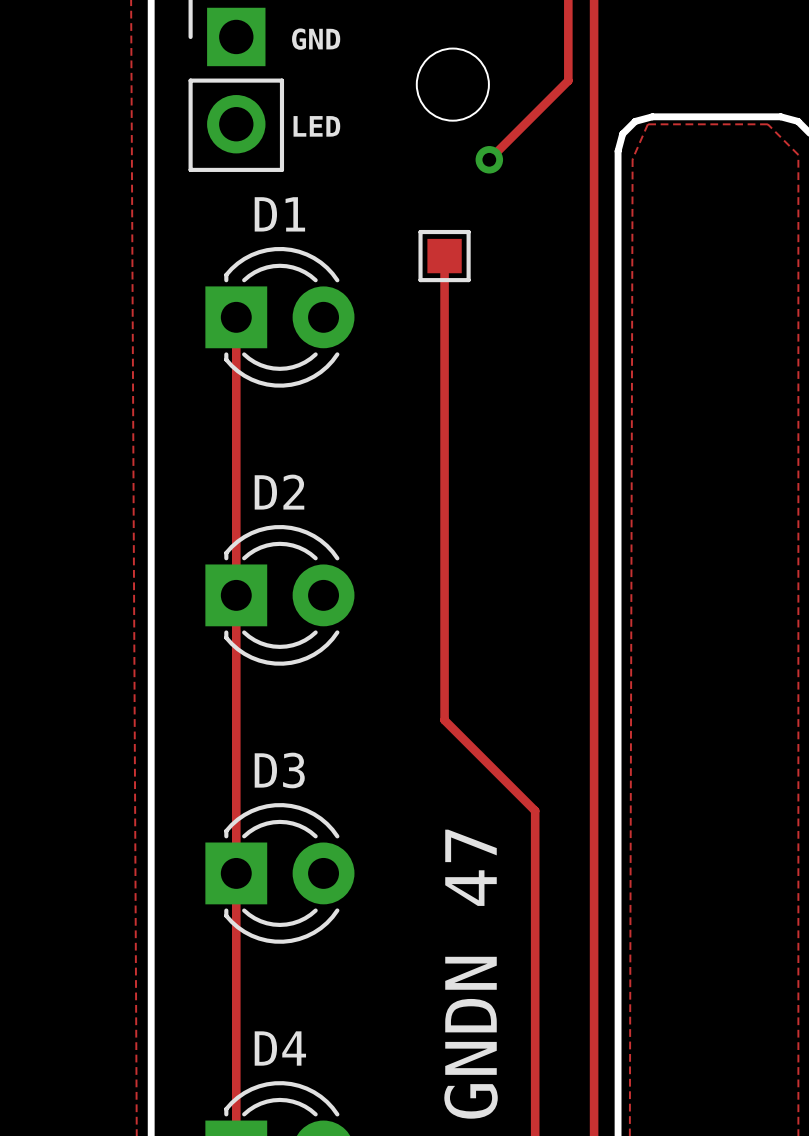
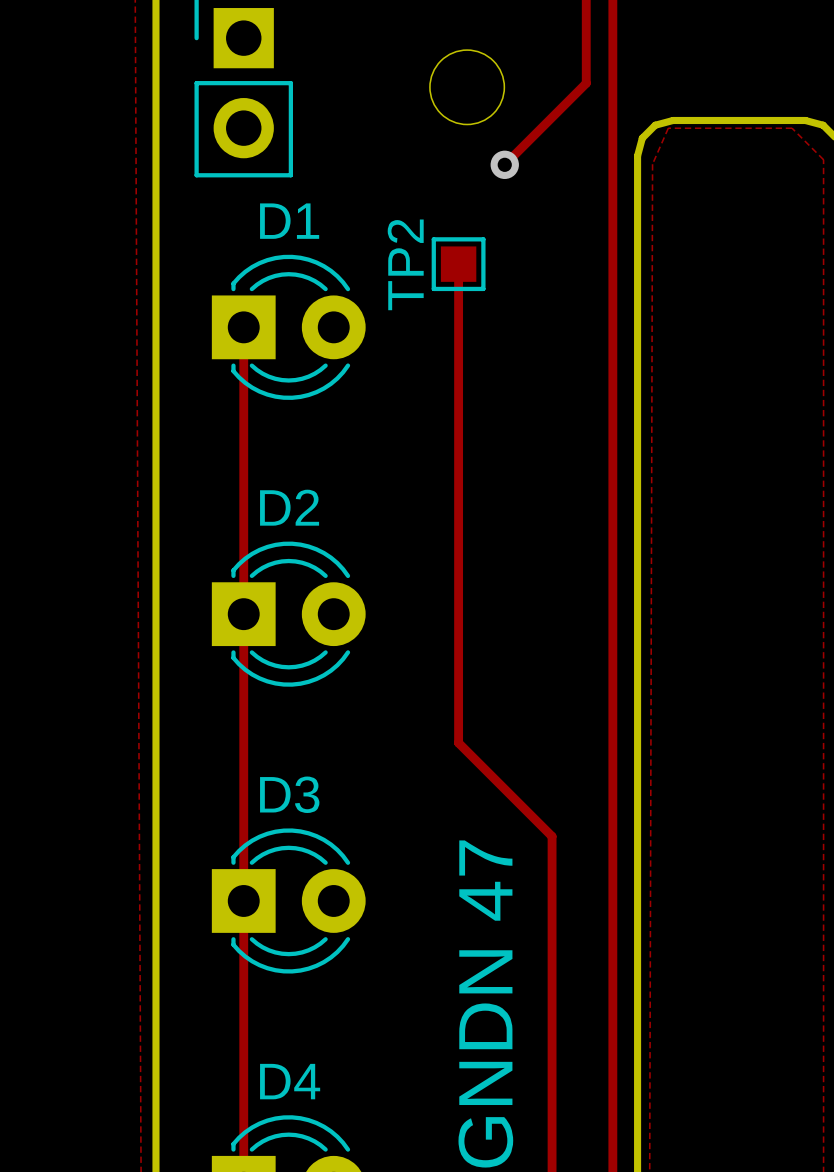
text: GND (316, 39) -> none
text: LED (316, 126) -> none
TP2 name: none -> TP2 (405, 264)

